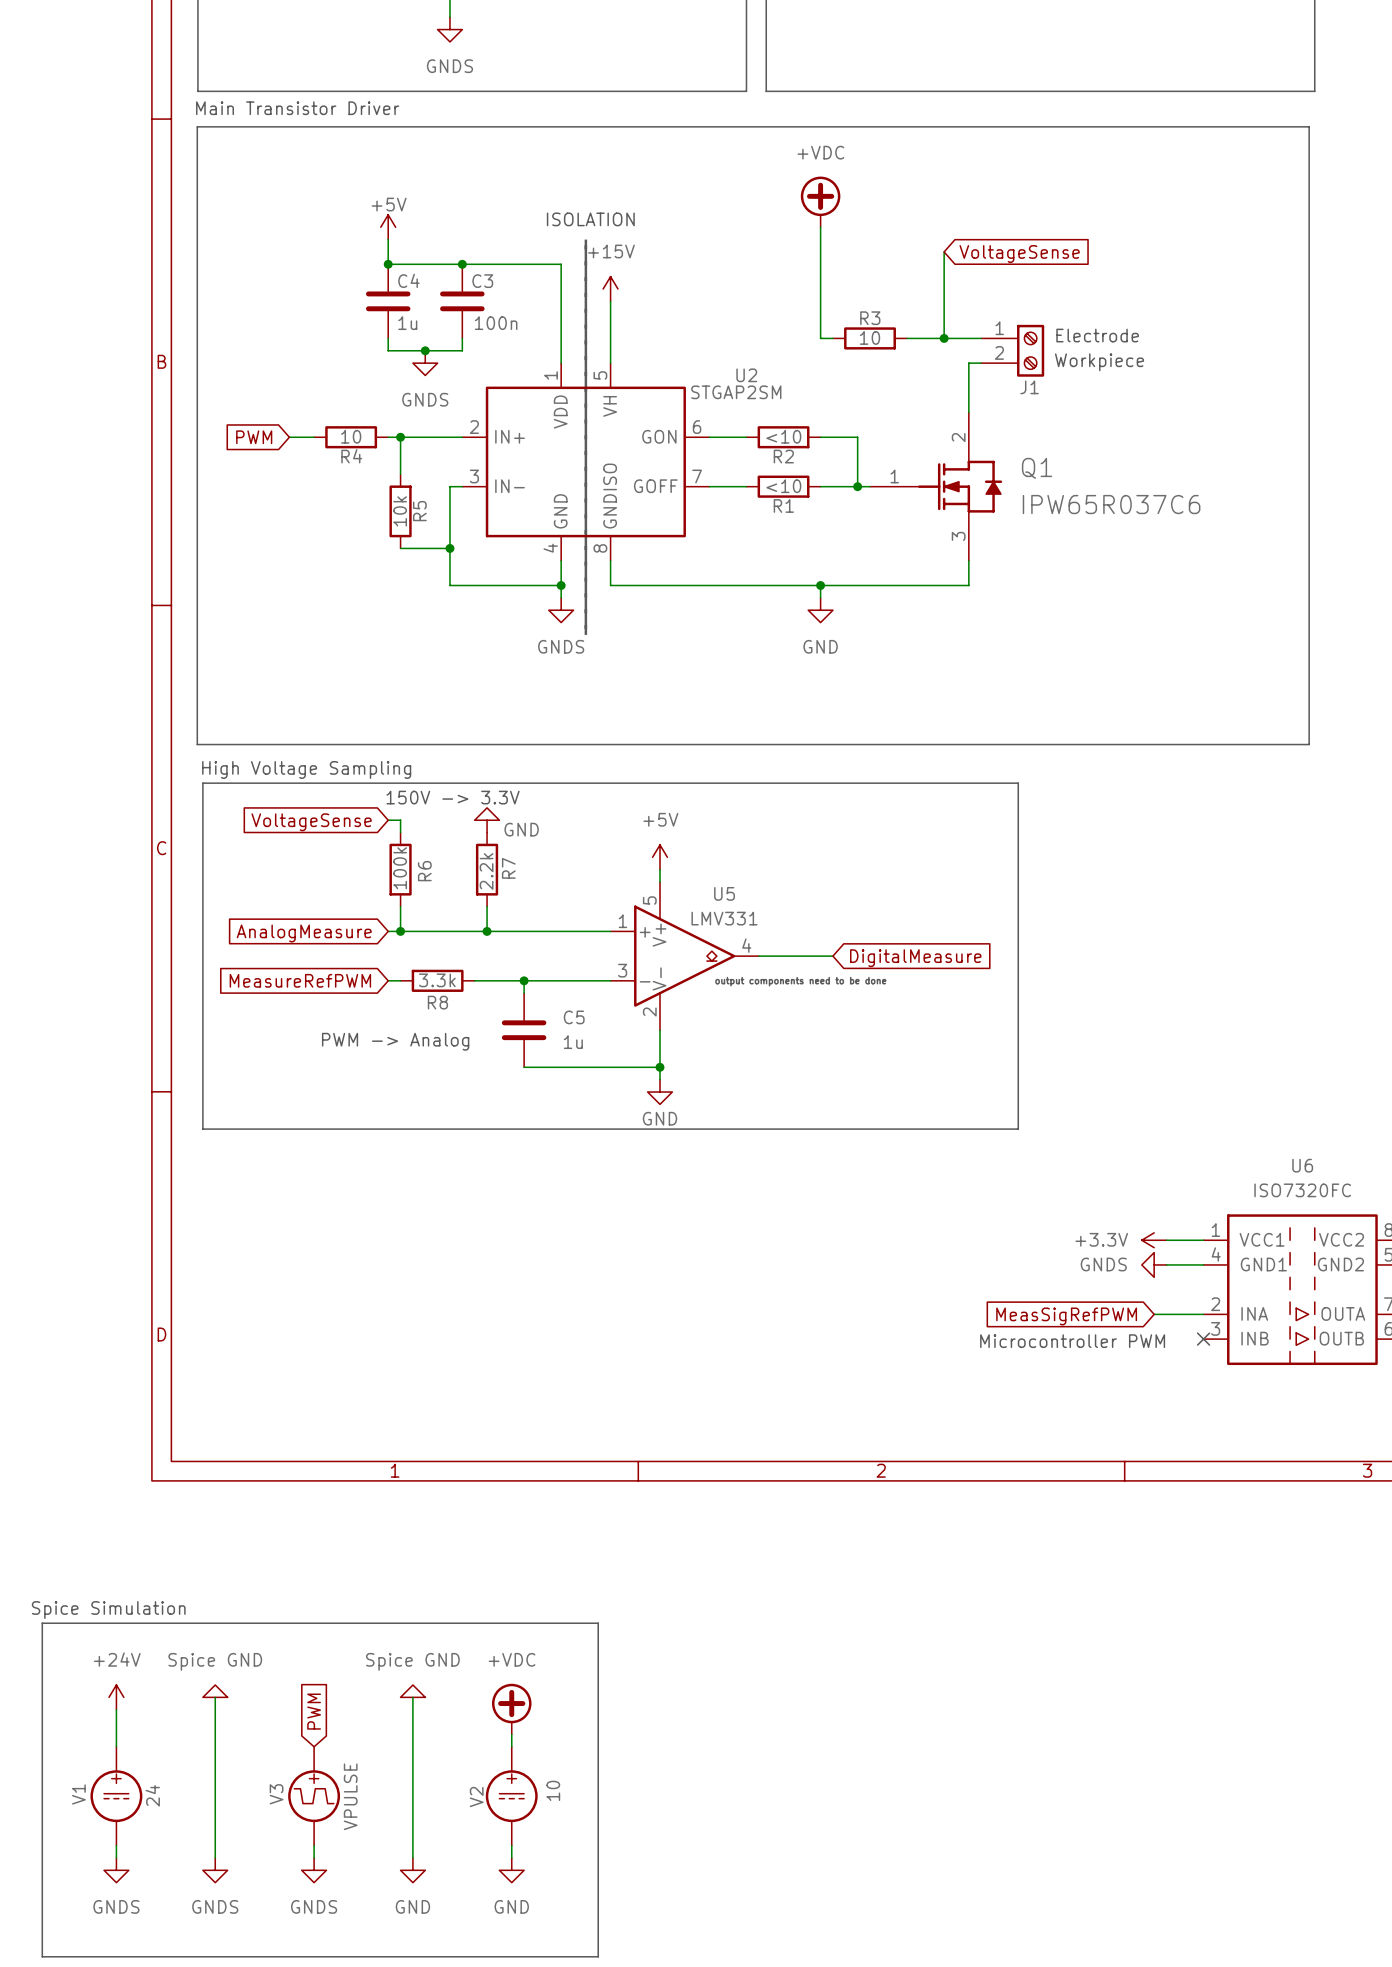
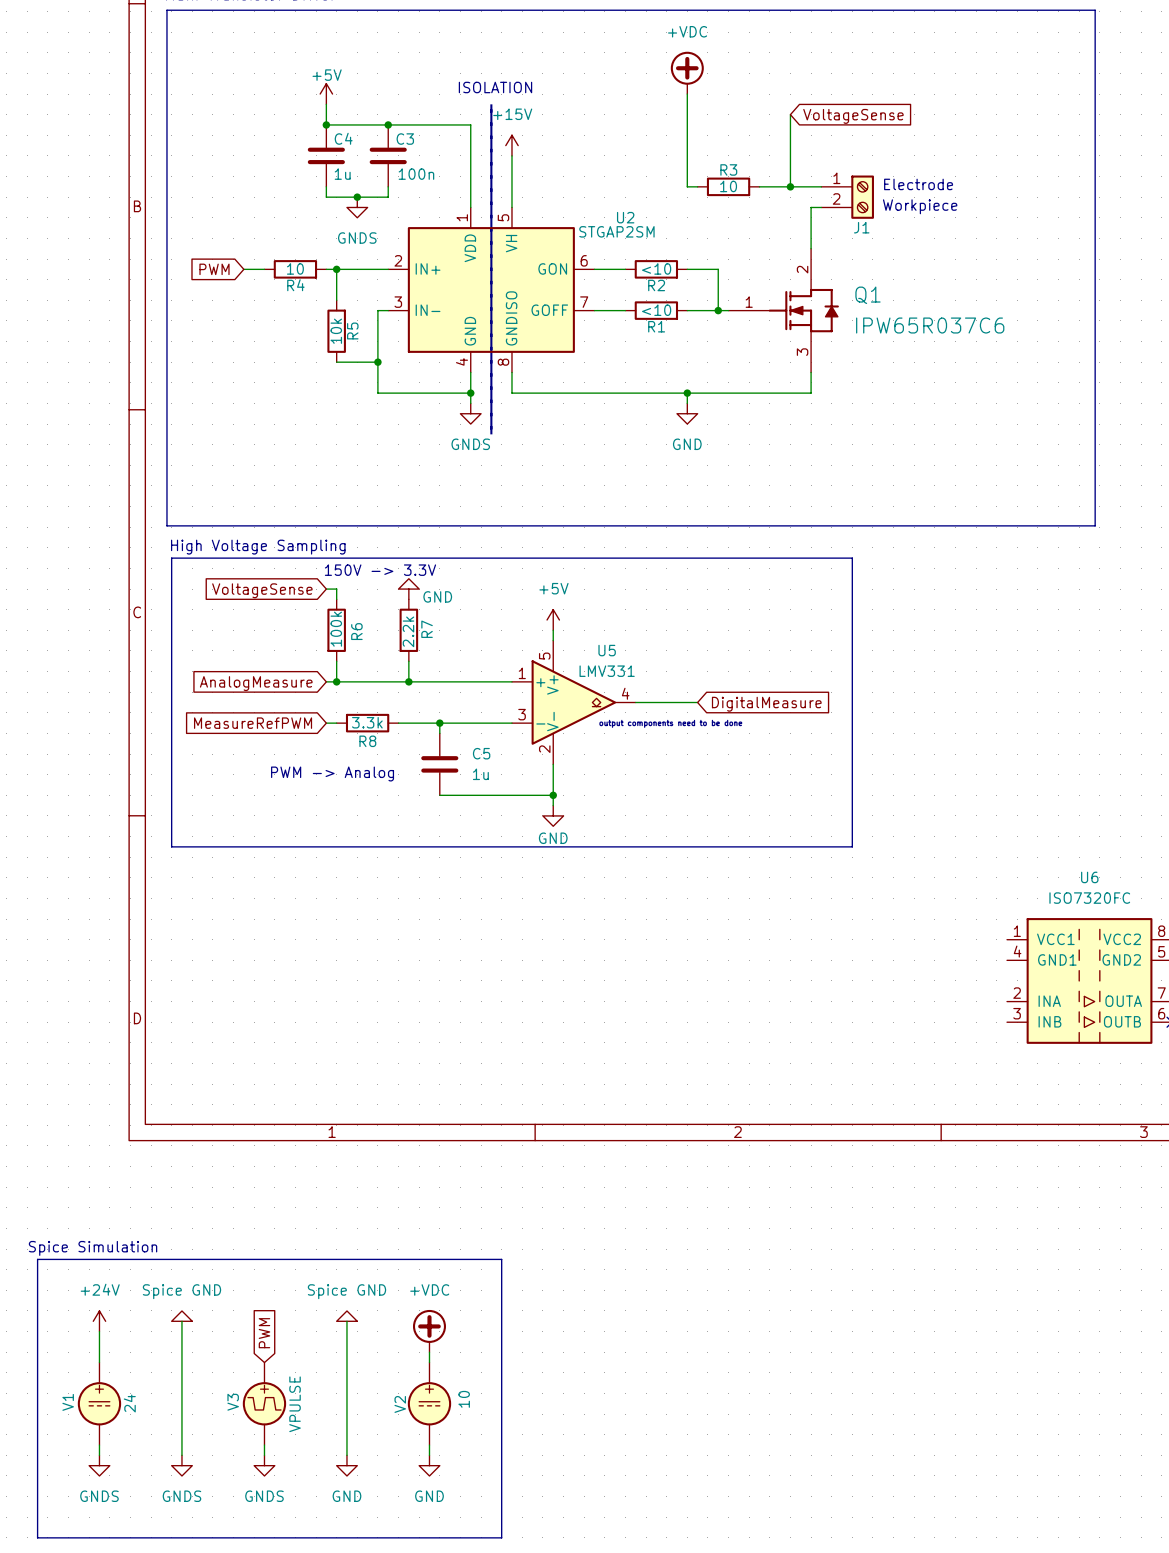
power symbol: +3.3V (1154, 1240) -> none
wire: (1166, 1240) (1203, 1240) -> none
power symbol: GNDS (1154, 1264) -> none
wire: (1166, 1264) (1203, 1264) -> none
wire: (1154, 1314) (1203, 1314) -> none
global label: MeasSigRefPWM (1066, 1316) -> none
no-connect mark: (1203, 1339) -> none
text: Microcontroller PWM (1072, 1341) -> none

